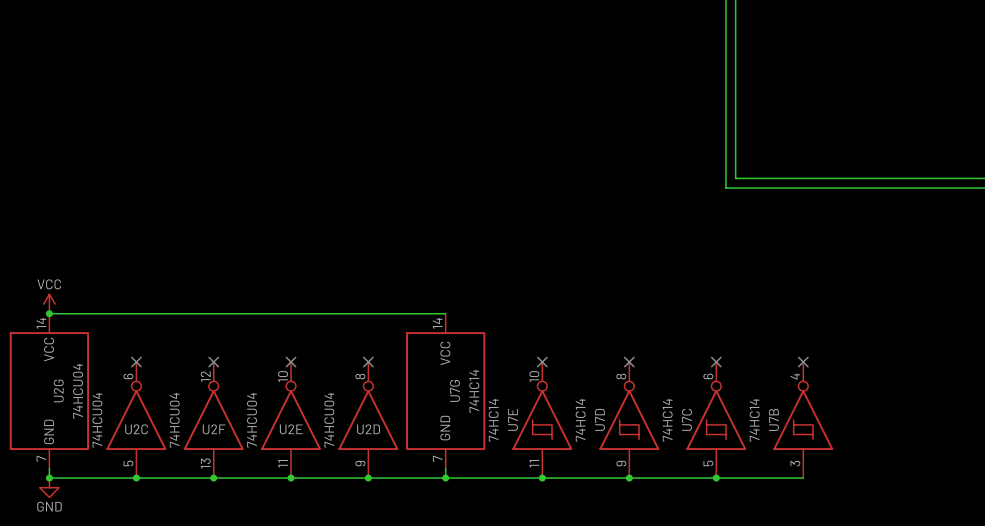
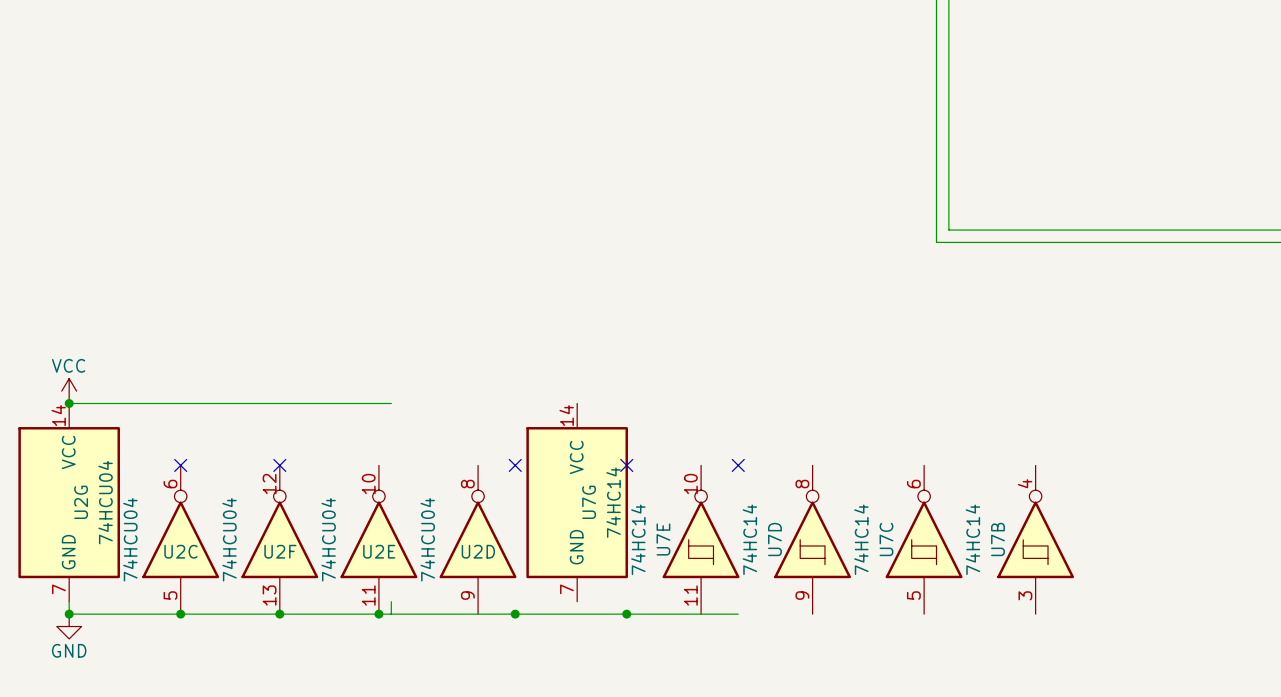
wire: (300, 313) (445, 313) -> none
no-connect mark: (291, 362) -> none
no-connect mark position: (368, 362) -> (515, 465)
no-connect mark: none -> (626, 465)
no-connect mark: (542, 362) -> none
no-connect mark: none -> (738, 465)
no-connect mark: (629, 362) -> none
no-connect mark: (716, 362) -> none
no-connect mark: (803, 362) -> none
wire: (445, 468) (445, 478) -> (391, 601) (391, 614)
junction: (368, 478) -> none
junction: none -> (515, 614)
junction: (445, 478) -> none
junction: none -> (626, 614)
junction: (542, 478) -> none
wire: (571, 478) (803, 478) -> none
junction: (629, 478) -> none
junction: (716, 478) -> none

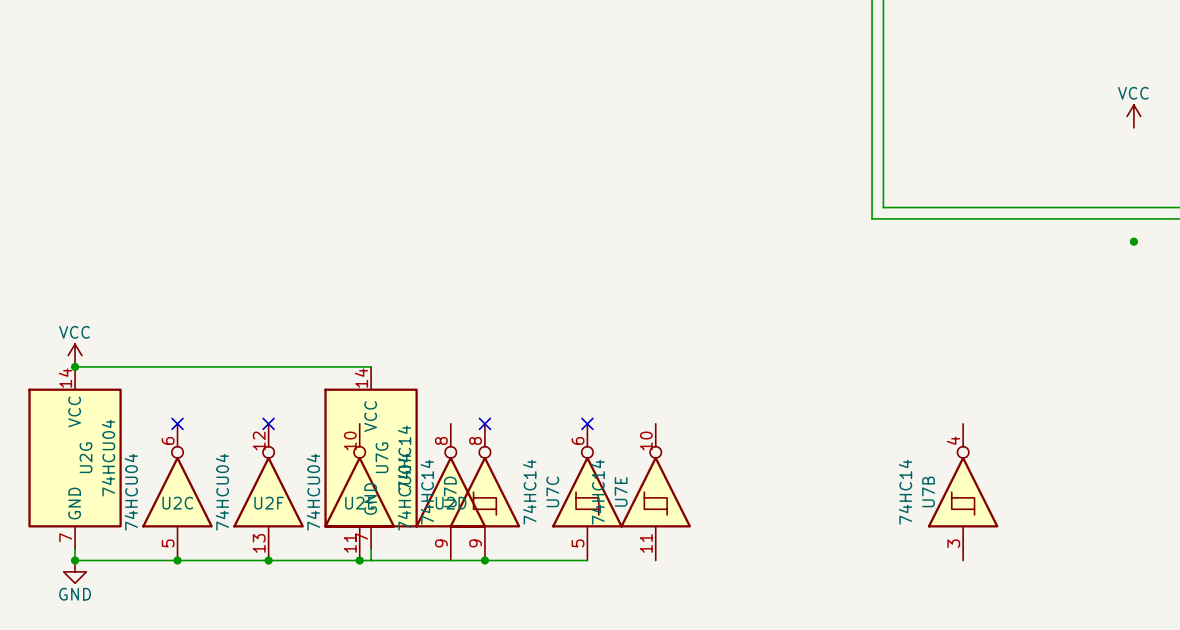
power symbol: none -> VCC (1133, 116)
junction: none -> (1133, 241)
no-connect mark: (738, 465) -> none
U7G position: (577, 502) -> (371, 458)
U7D position: (812, 539) -> (484, 492)
U7C position: (924, 539) -> (587, 492)
wire: (626, 614) (738, 614) -> none
junction: (626, 614) -> none

